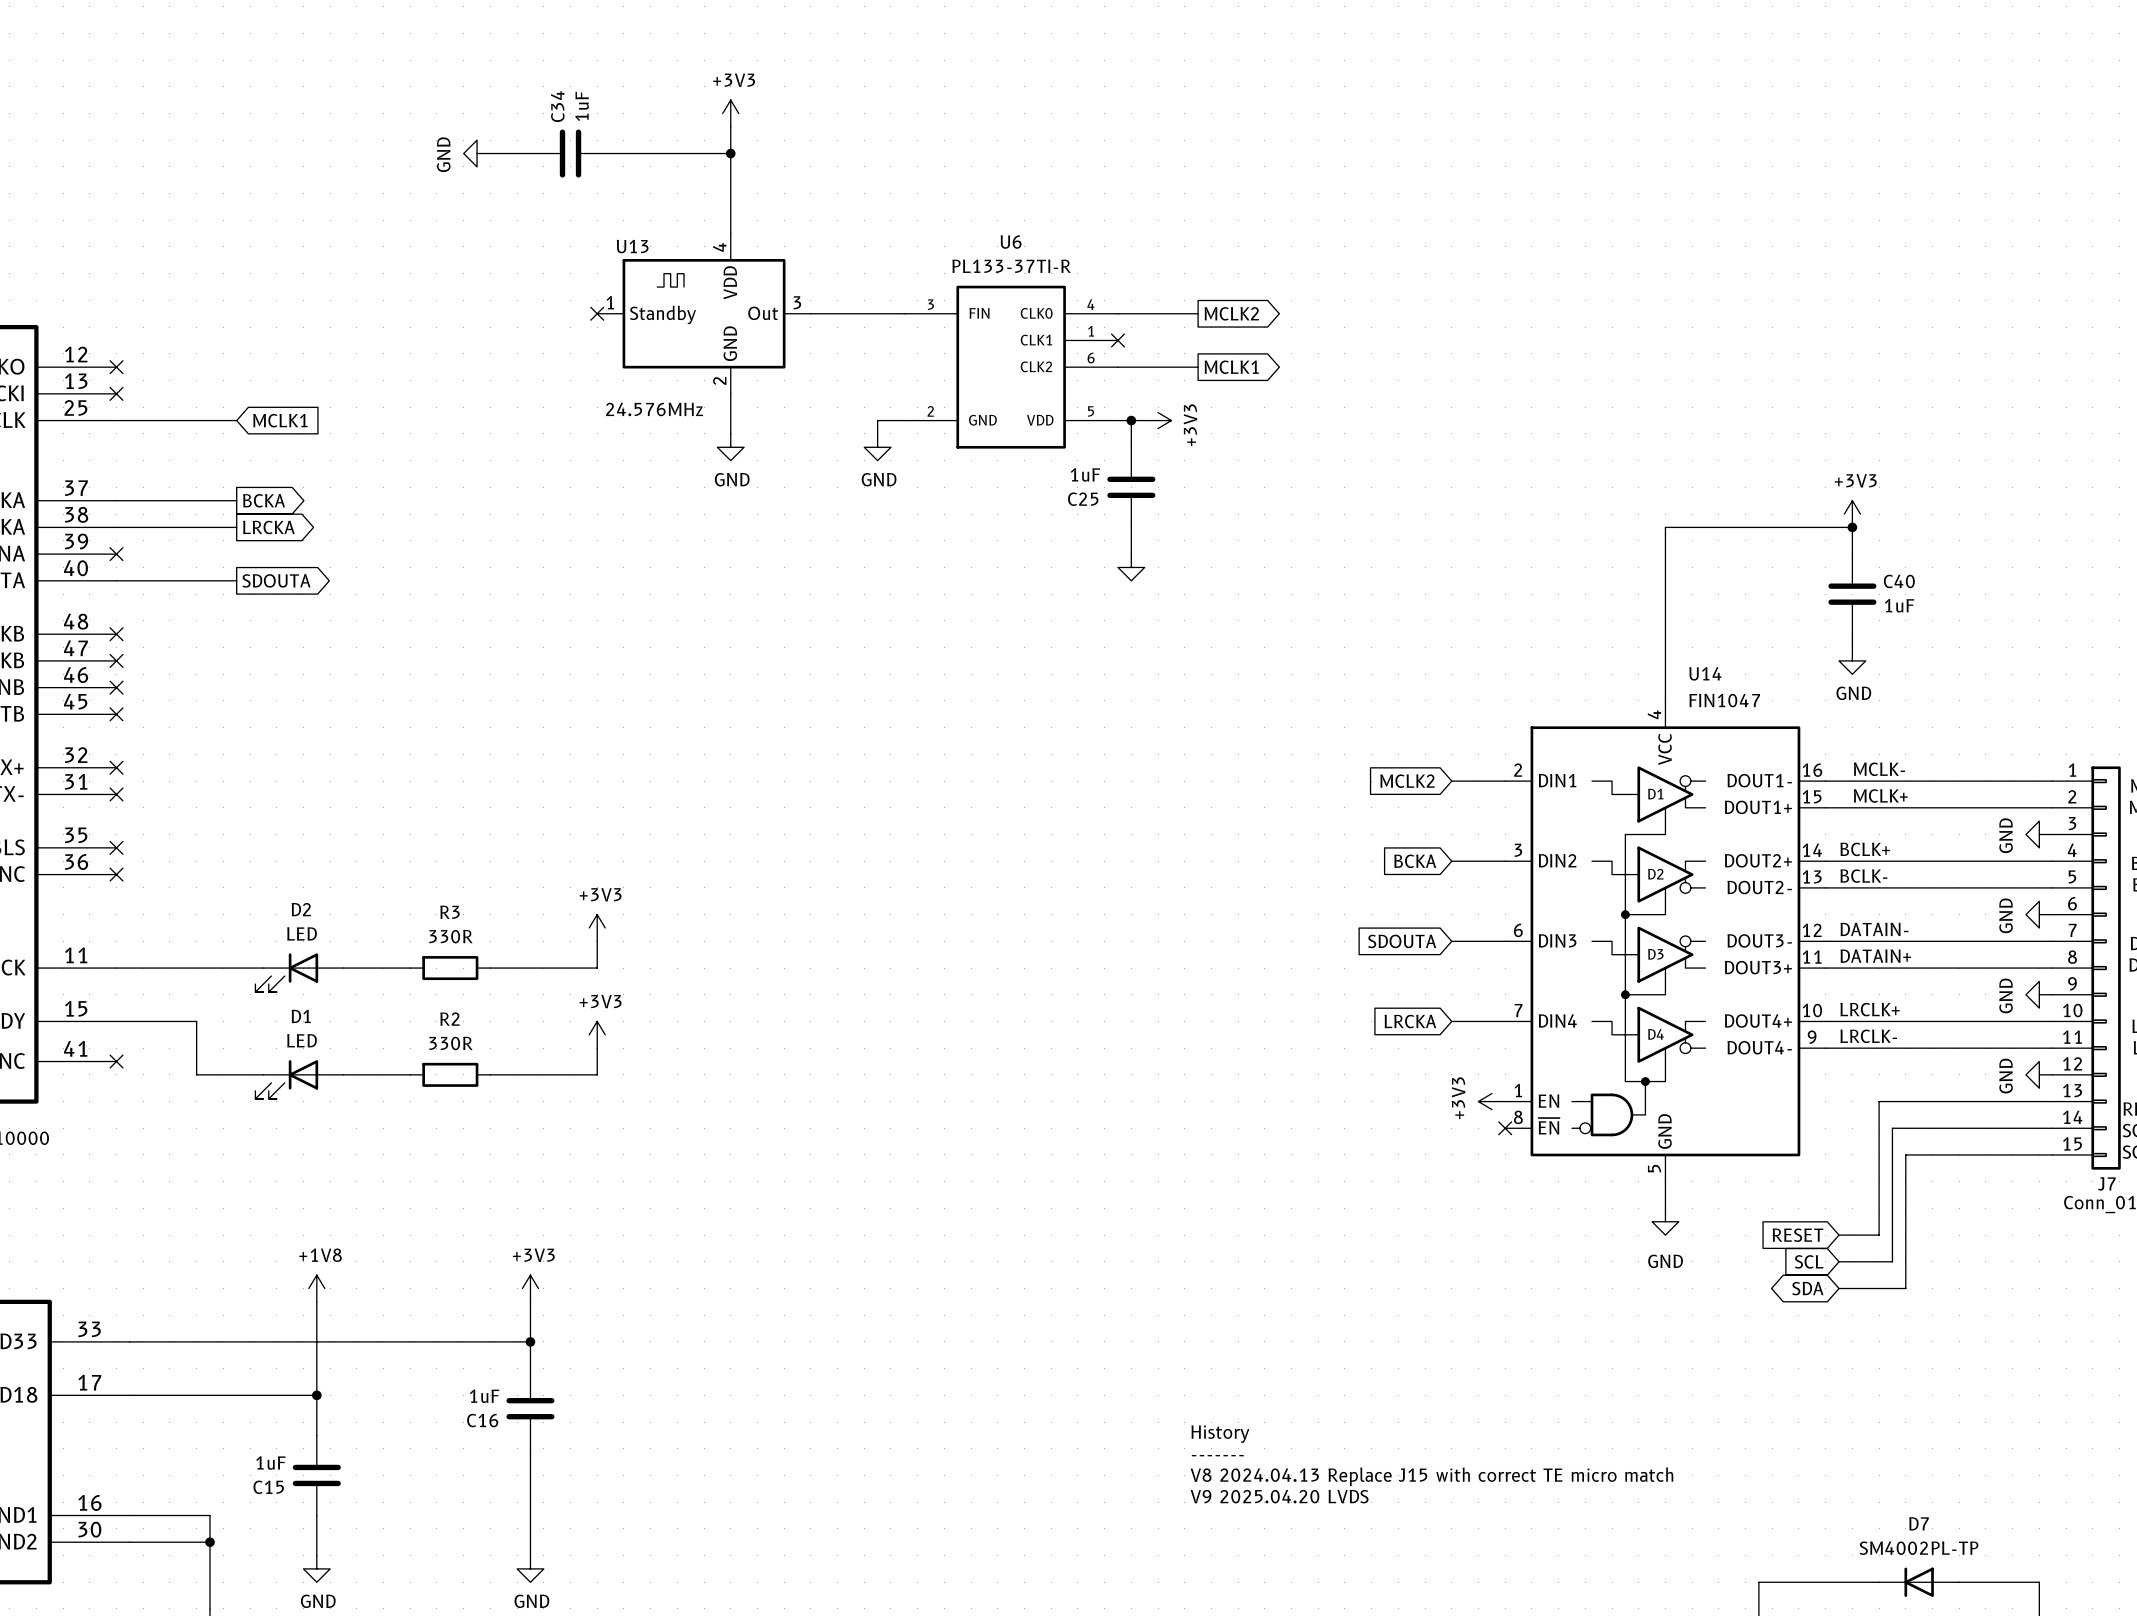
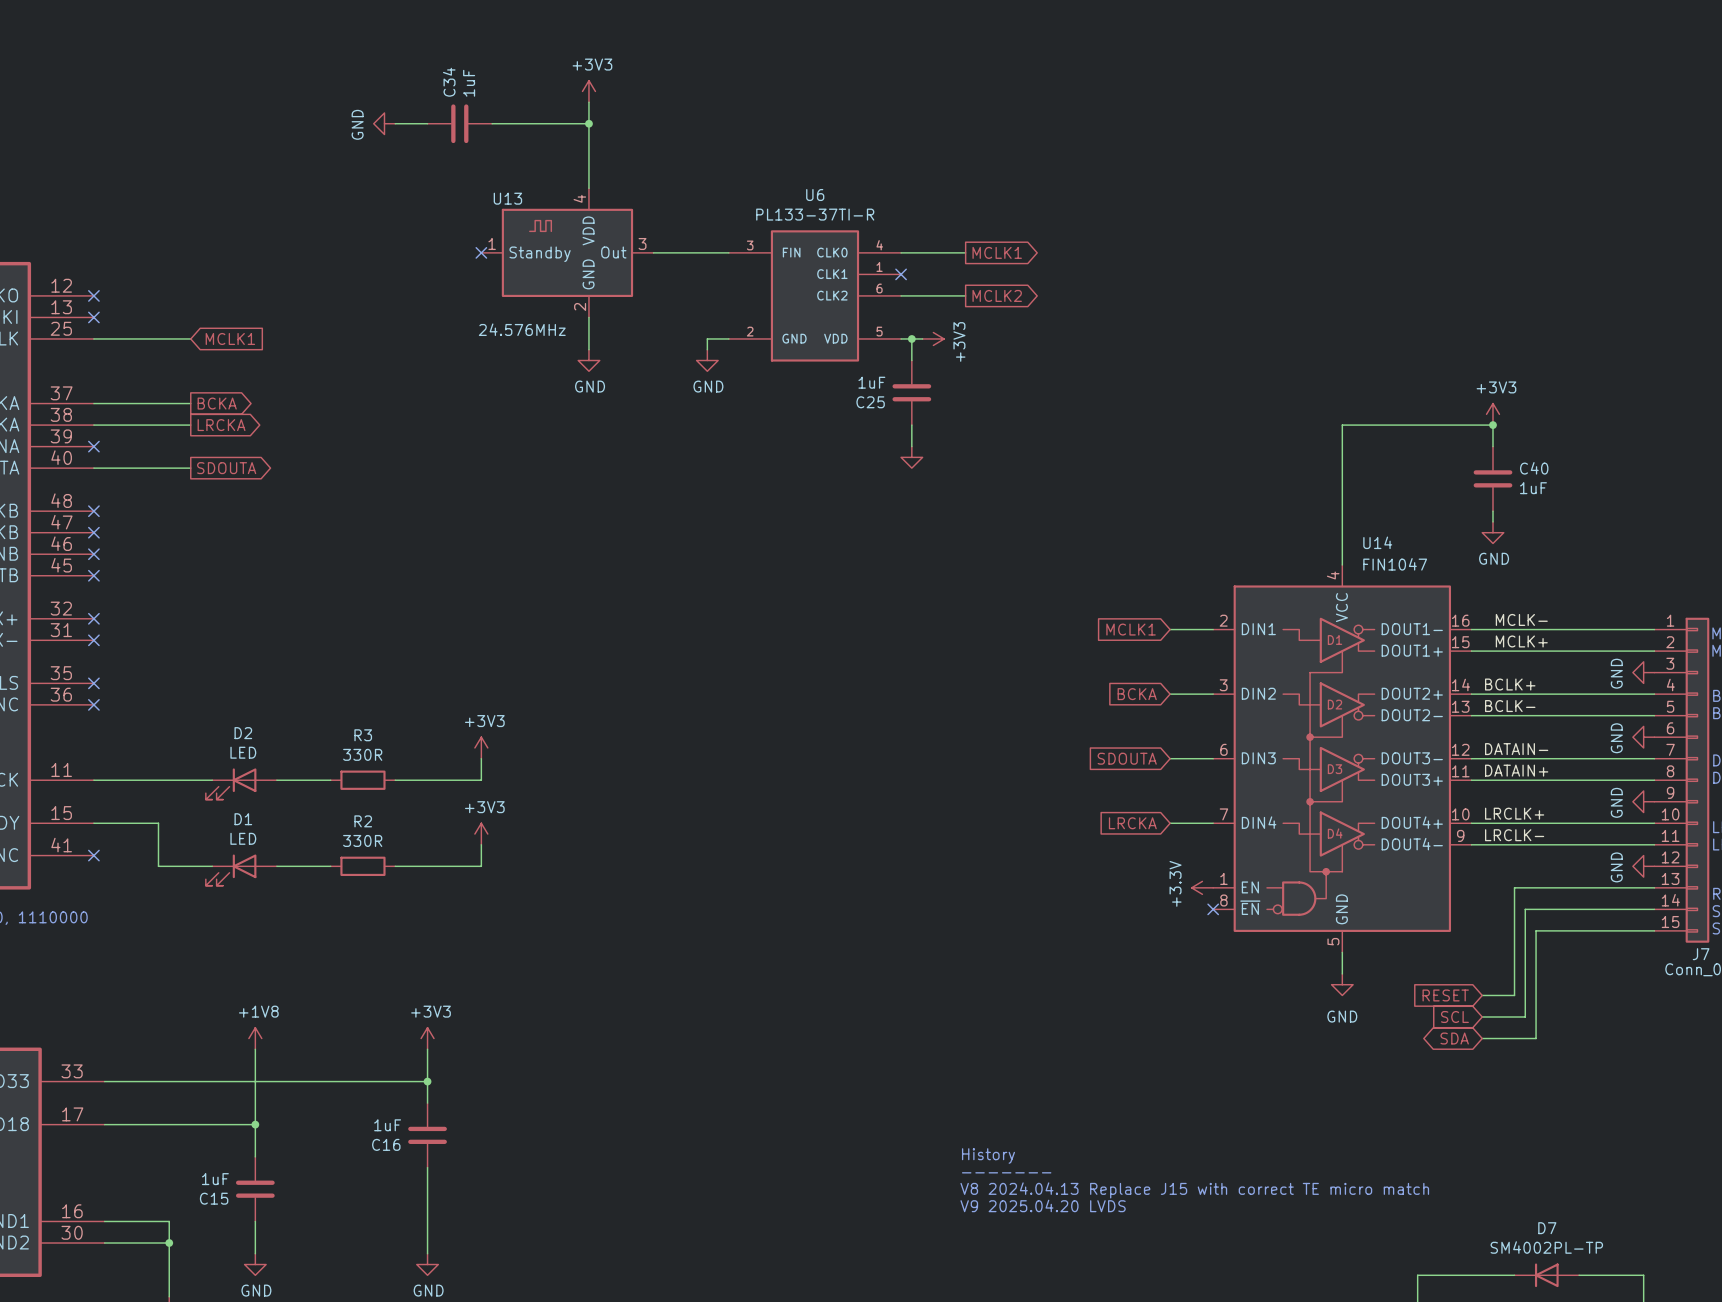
global label: MCLK2 (1231, 313) -> MCLK1 (997, 252)
global label: MCLK1 (1231, 367) -> MCLK2 (997, 295)
global label: MCLK2 (1407, 781) -> MCLK1 (1131, 629)
power symbol: +3V3 (1491, 1101) -> +3.3V (1202, 887)

